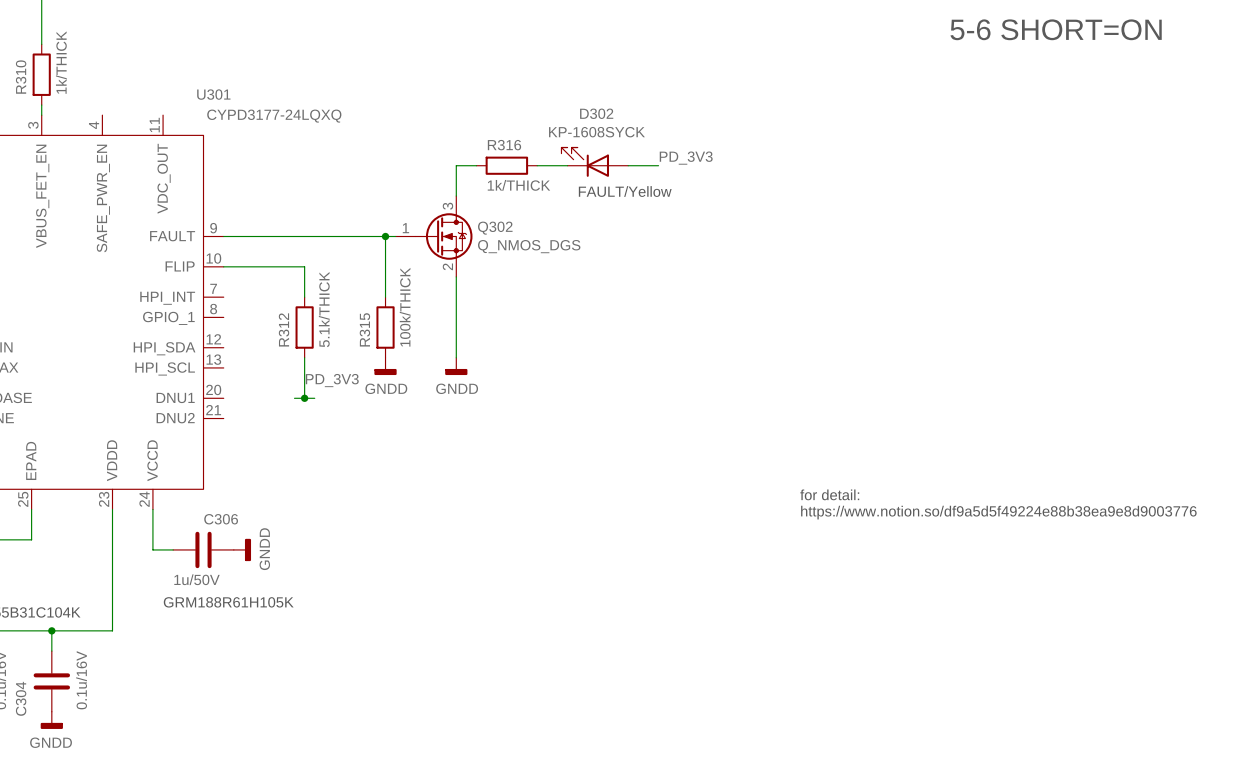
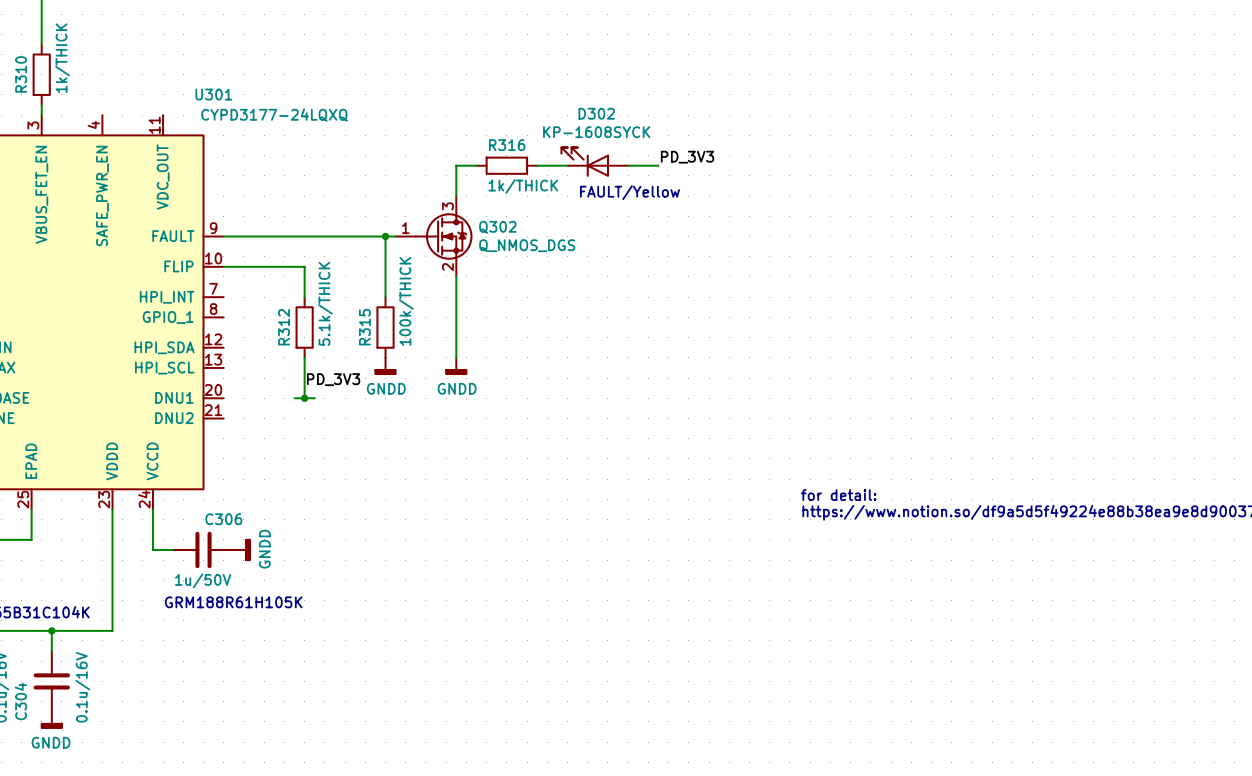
text: 5-6 SHORT=ON (1056, 29) -> none

